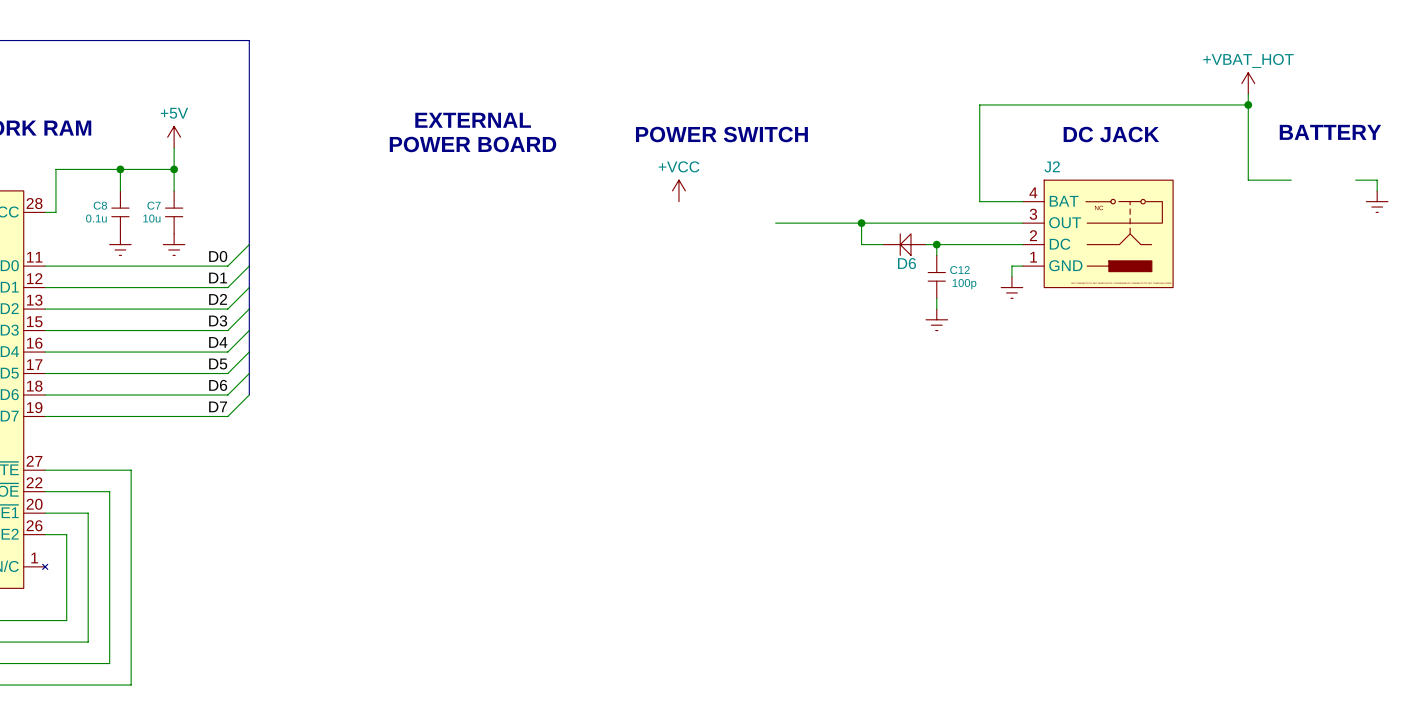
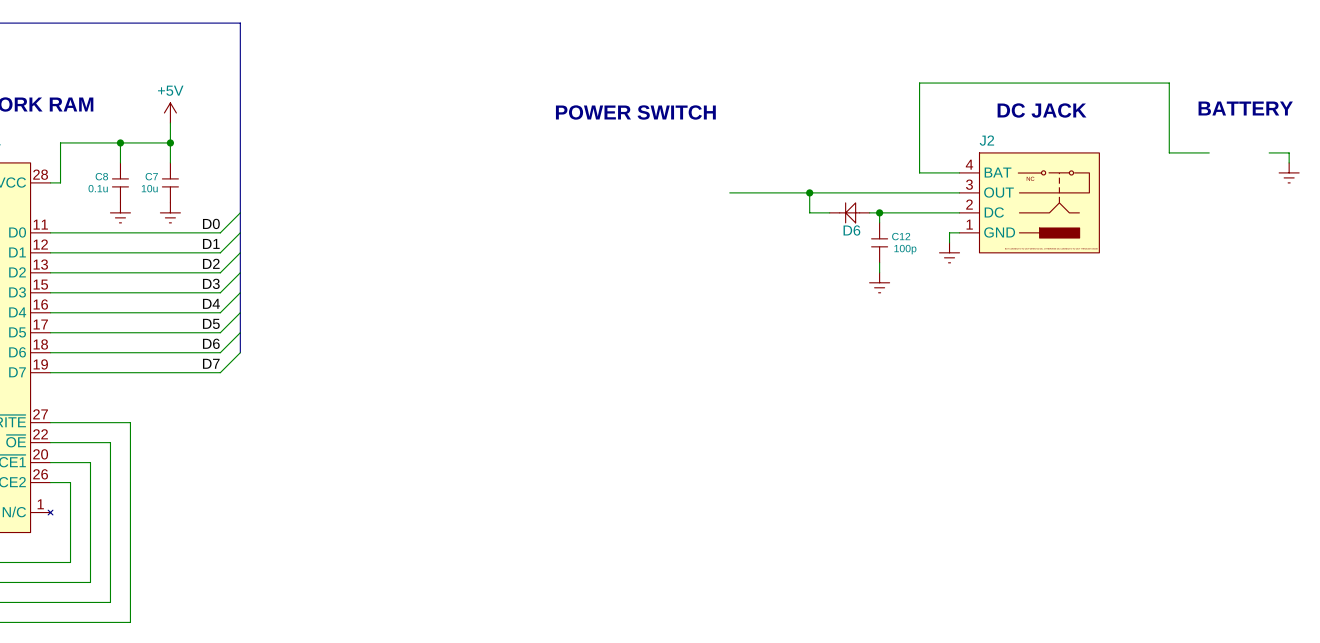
power symbol: +VBAT_HOT (1248, 83) -> none
wire: (1248, 94) (1248, 104) -> none
junction: (1248, 104) -> none
text: EXTERNAL (473, 120) -> none
text position: POWER SWITCH (721, 134) -> POWER SWITCH (635, 112)
text: POWER BOARD (473, 144) -> none
power symbol: +VCC (678, 190) -> none

